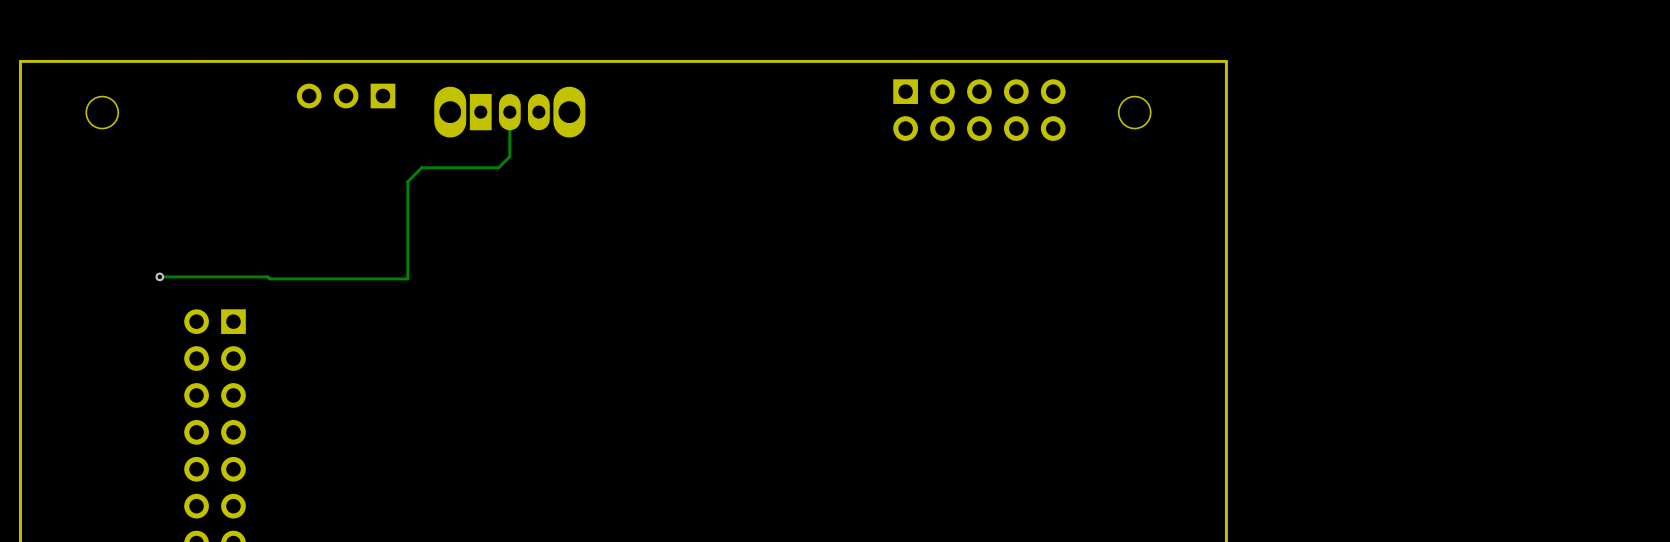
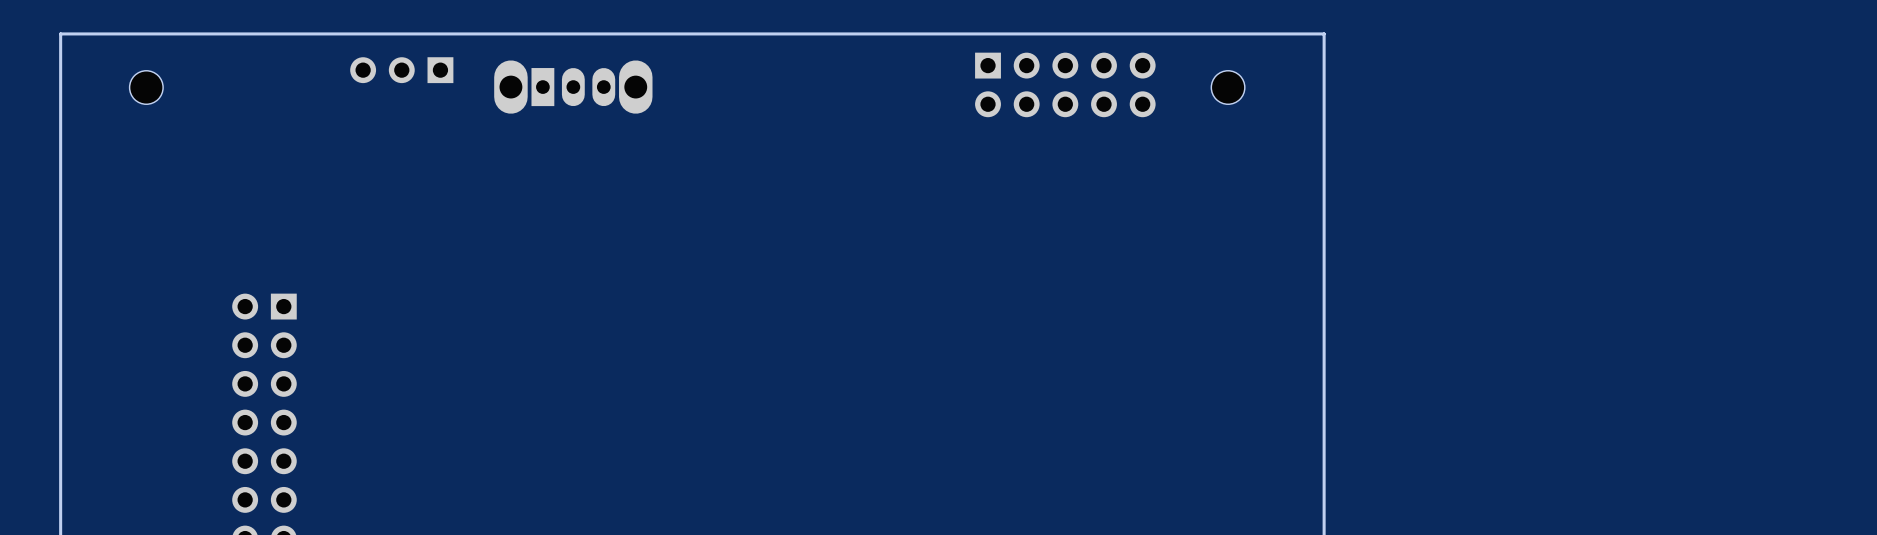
track: (509, 112) (509, 156) (498, 167) (421, 167) (407, 181) (407, 278) (159, 276) -> none
via: (159, 276) -> none

